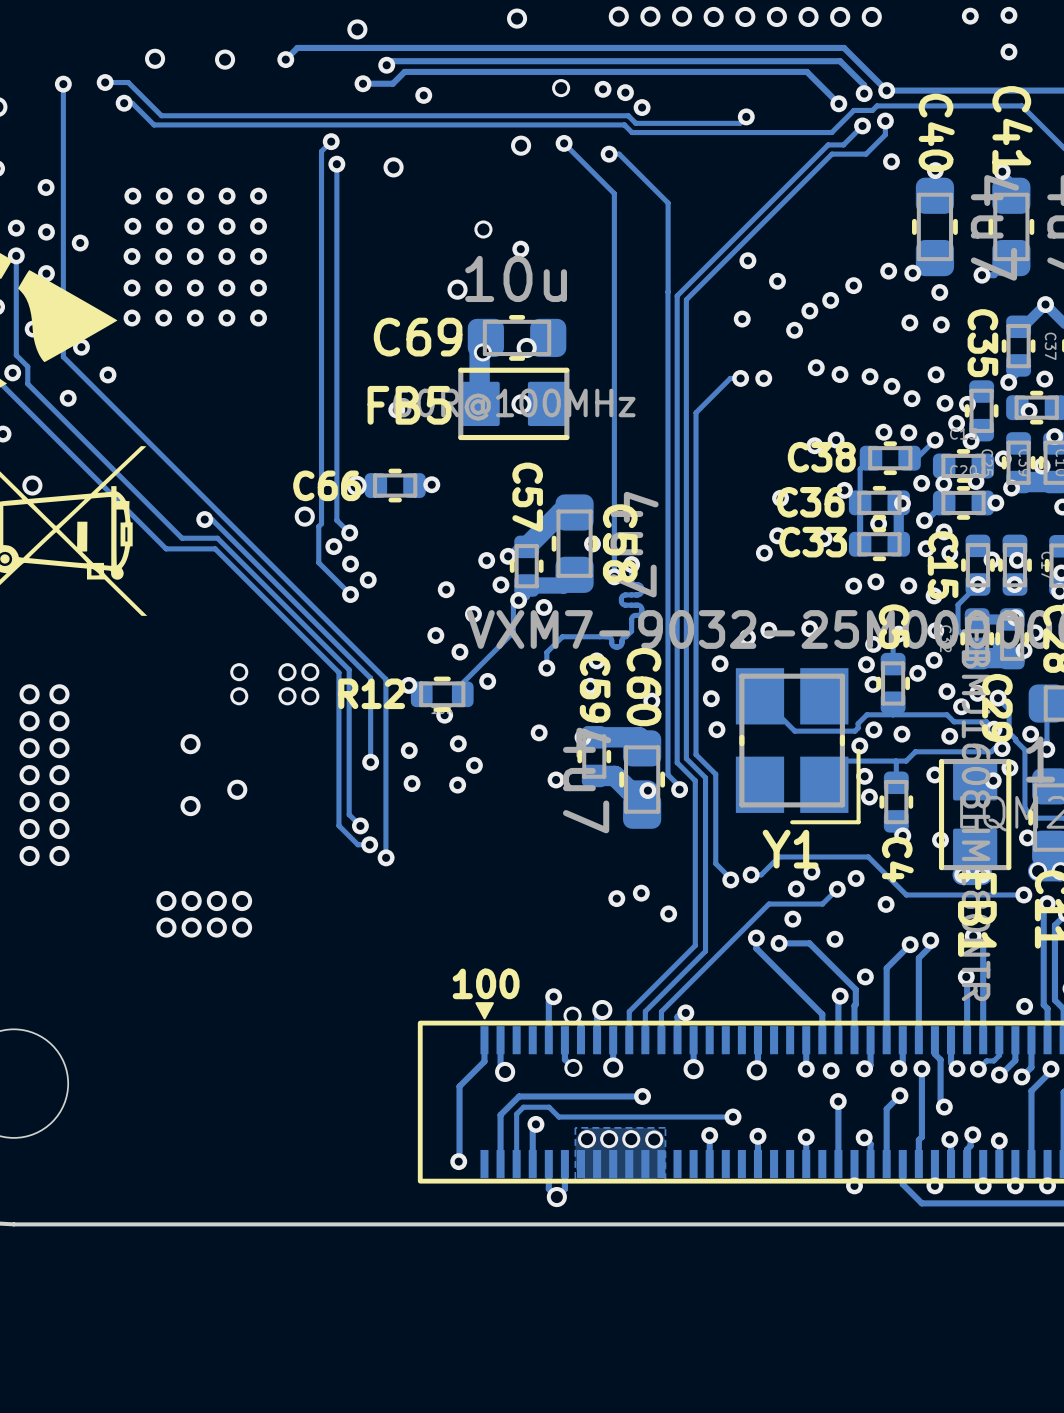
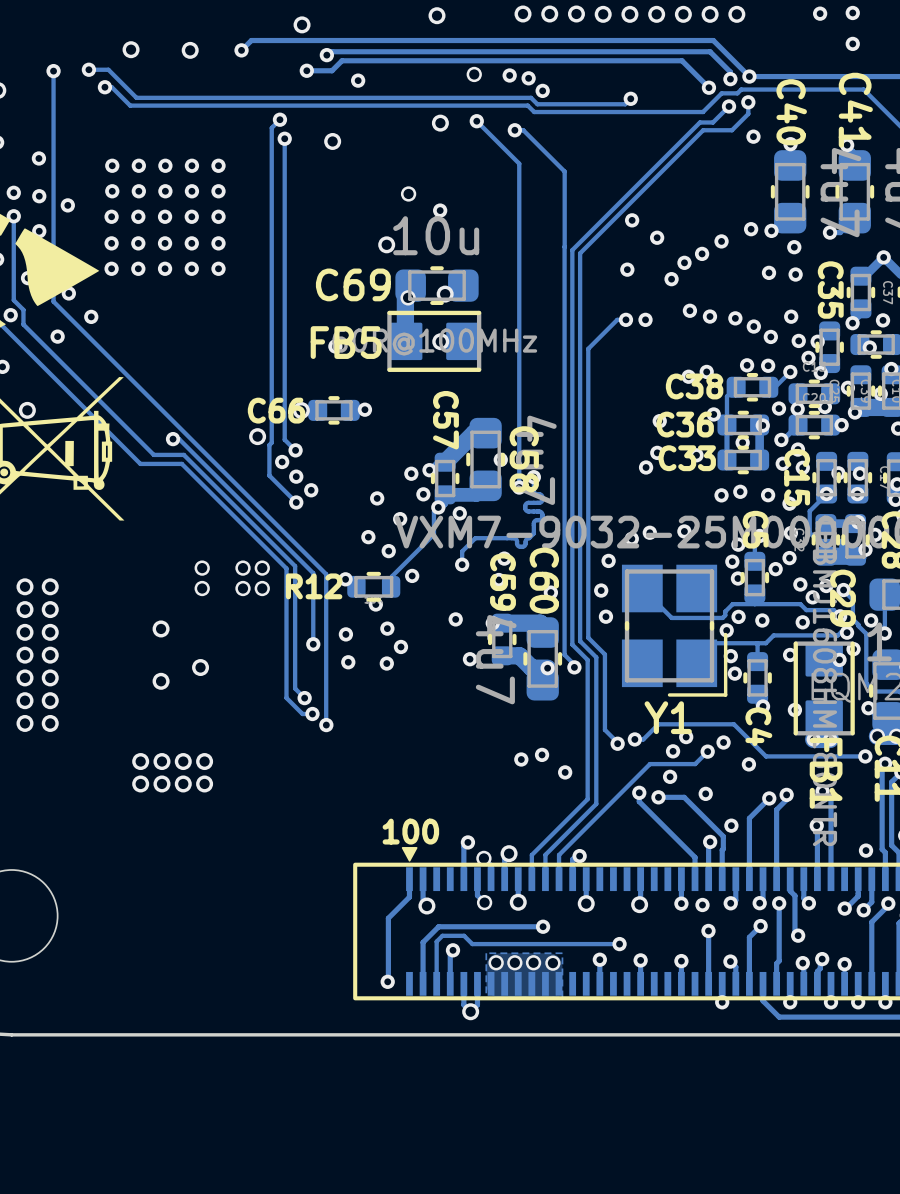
track: (999, 1040) (999, 1055) (993, 1060) (986, 1060) (978, 1069) -> none
via: (978, 1069) -> none

